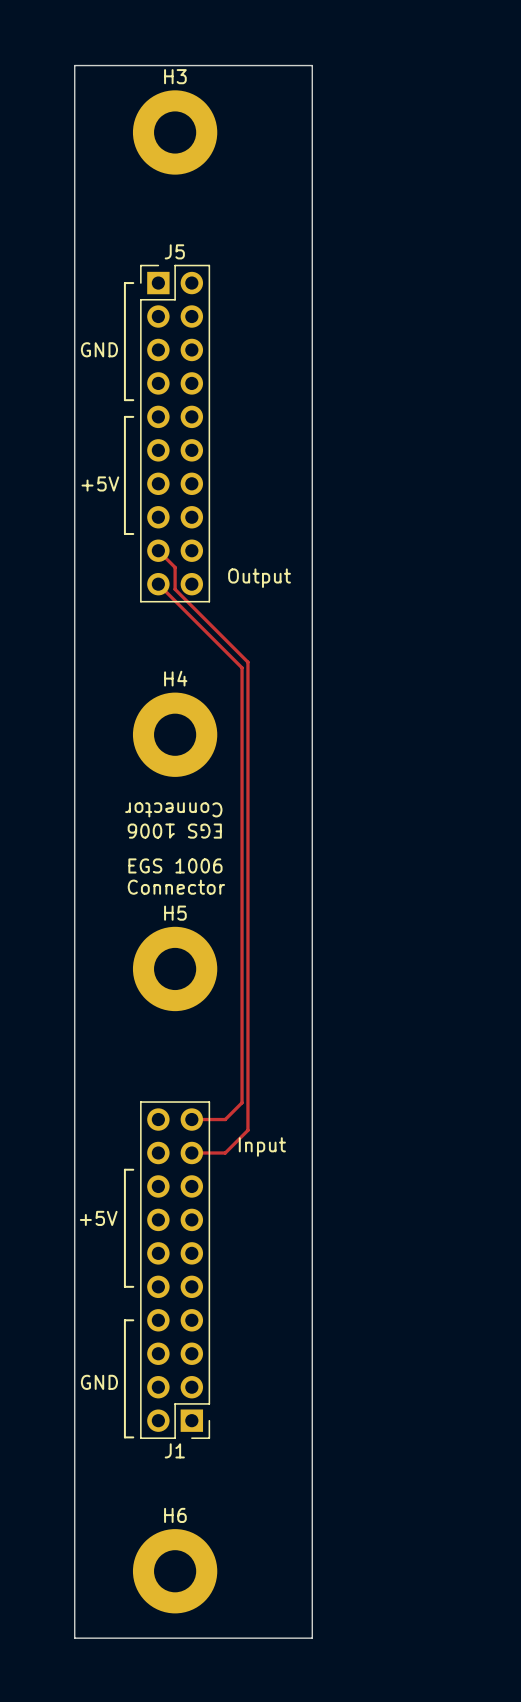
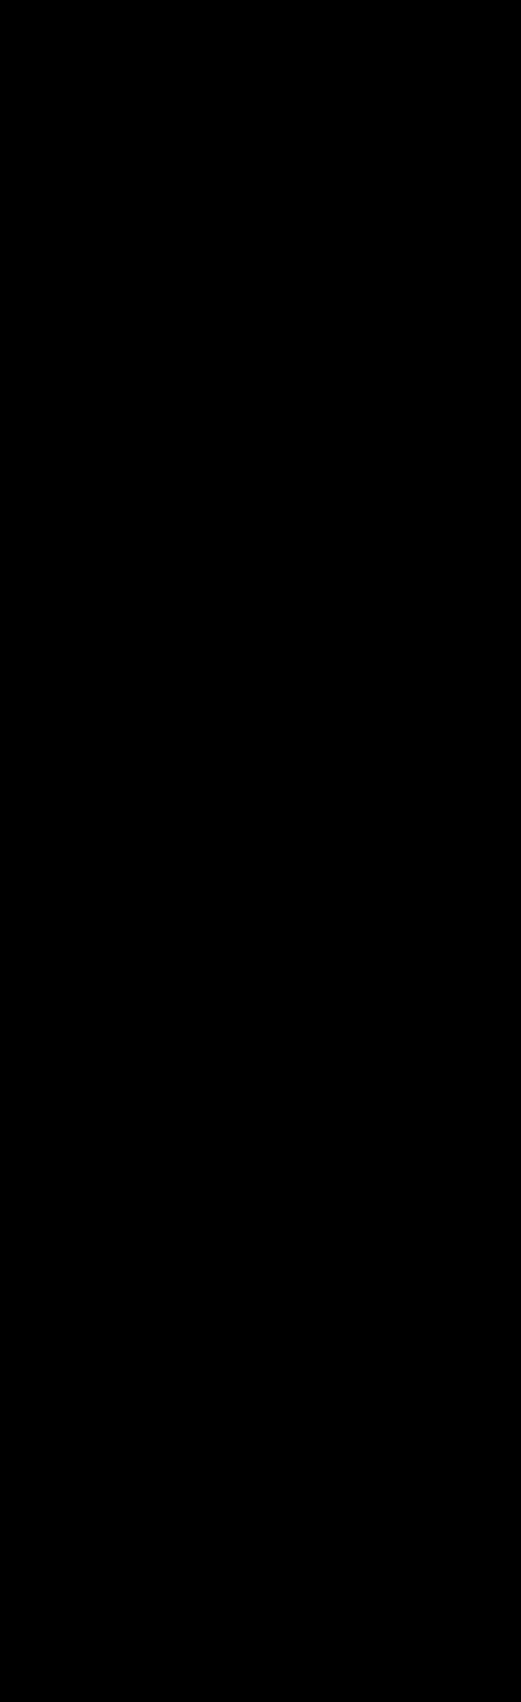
board edge: (74, 65) (312, 65) (312, 1638) (74, 1638) (74, 65) -> none
H3: (175, 132) -> none
line: (133, 283) (124, 283) (124, 400) (133, 400) -> none
text: GND (99, 349) -> none
line: (133, 416) (124, 416) (124, 533) (133, 533) -> none
J5: (175, 433) -> none
text: +5V (100, 483) -> none
track: (158, 550) (175, 567) (175, 589) (247, 662) (247, 1130) (225, 1153) (191, 1153) -> none
text: Output (259, 578) -> none
track: (158, 584) (242, 667) (242, 1102) (225, 1119) (191, 1119) -> none
H4: (175, 734) -> none
text: Connector (173, 809) -> none
text: EGS 1006 (174, 831) -> none
text: EGS 1006 (175, 865) -> none
text: Connector (176, 887) -> none
H5: (175, 968) -> none
text: Input (262, 1146) -> none
line: (133, 1169) (124, 1169) (124, 1286) (133, 1286) -> none
text: +5V (98, 1218) -> none
J1: (175, 1270) -> none
line: (133, 1320) (124, 1320) (124, 1437) (133, 1437) -> none
text: GND (99, 1382) -> none
H6: (175, 1571) -> none

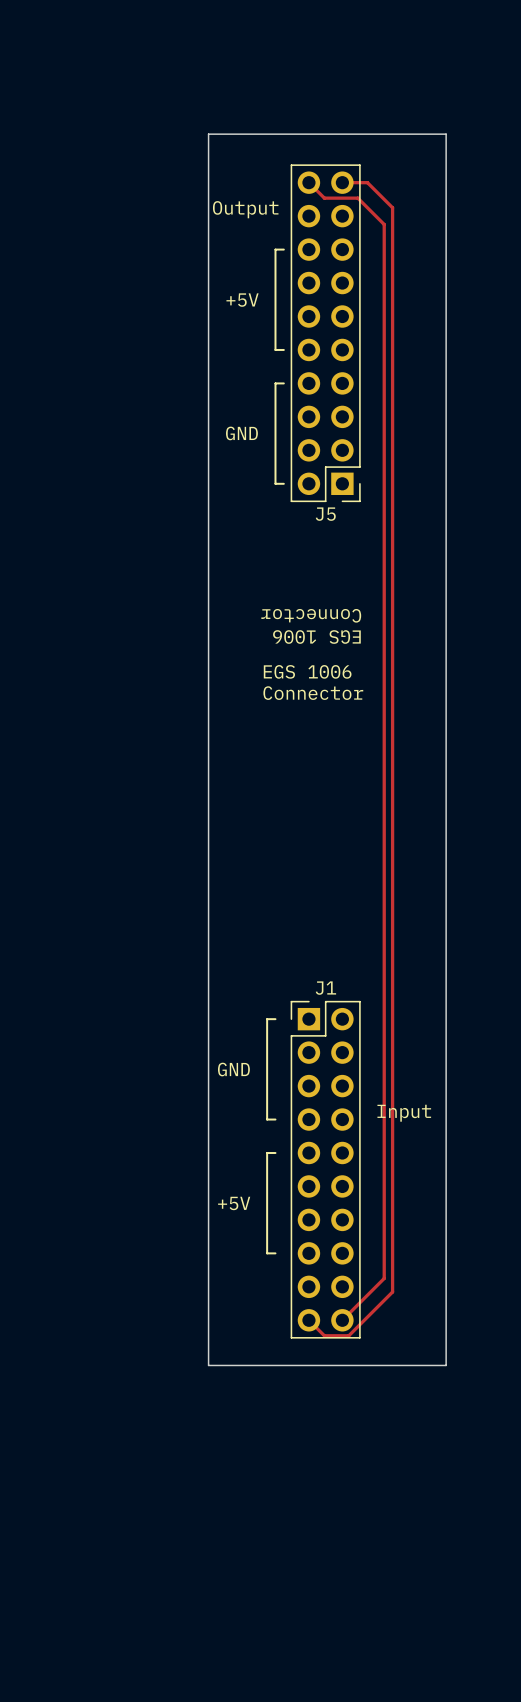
board edge: none -> (208, 134) (446, 134) (446, 1365) (208, 1365) (208, 134)
track: none -> (308, 182) (324, 198) (357, 198) (384, 224) (384, 1278) (342, 1320)
track: none -> (342, 182) (367, 182) (392, 207) (392, 1291) (348, 1335) (324, 1335) (308, 1320)
text: none -> Output (245, 209)
line: none -> (283, 249) (275, 249) (275, 349) (283, 349)
text: none -> +5V (242, 300)
J5: none -> (325, 333)
line: none -> (283, 383) (275, 383) (275, 483) (283, 483)
text: none -> GND (241, 433)
text: none -> Connector (311, 615)
text: none -> EGS 1006 (316, 637)
text: none -> EGS 1006 (307, 671)
text: none -> Connector (313, 693)
line: none -> (275, 1019) (267, 1019) (267, 1119) (275, 1119)
text: none -> GND (233, 1069)
text: none -> Input (404, 1113)
line: none -> (275, 1153) (267, 1153) (267, 1253) (275, 1253)
J1: none -> (325, 1169)
text: none -> +5V (234, 1203)

